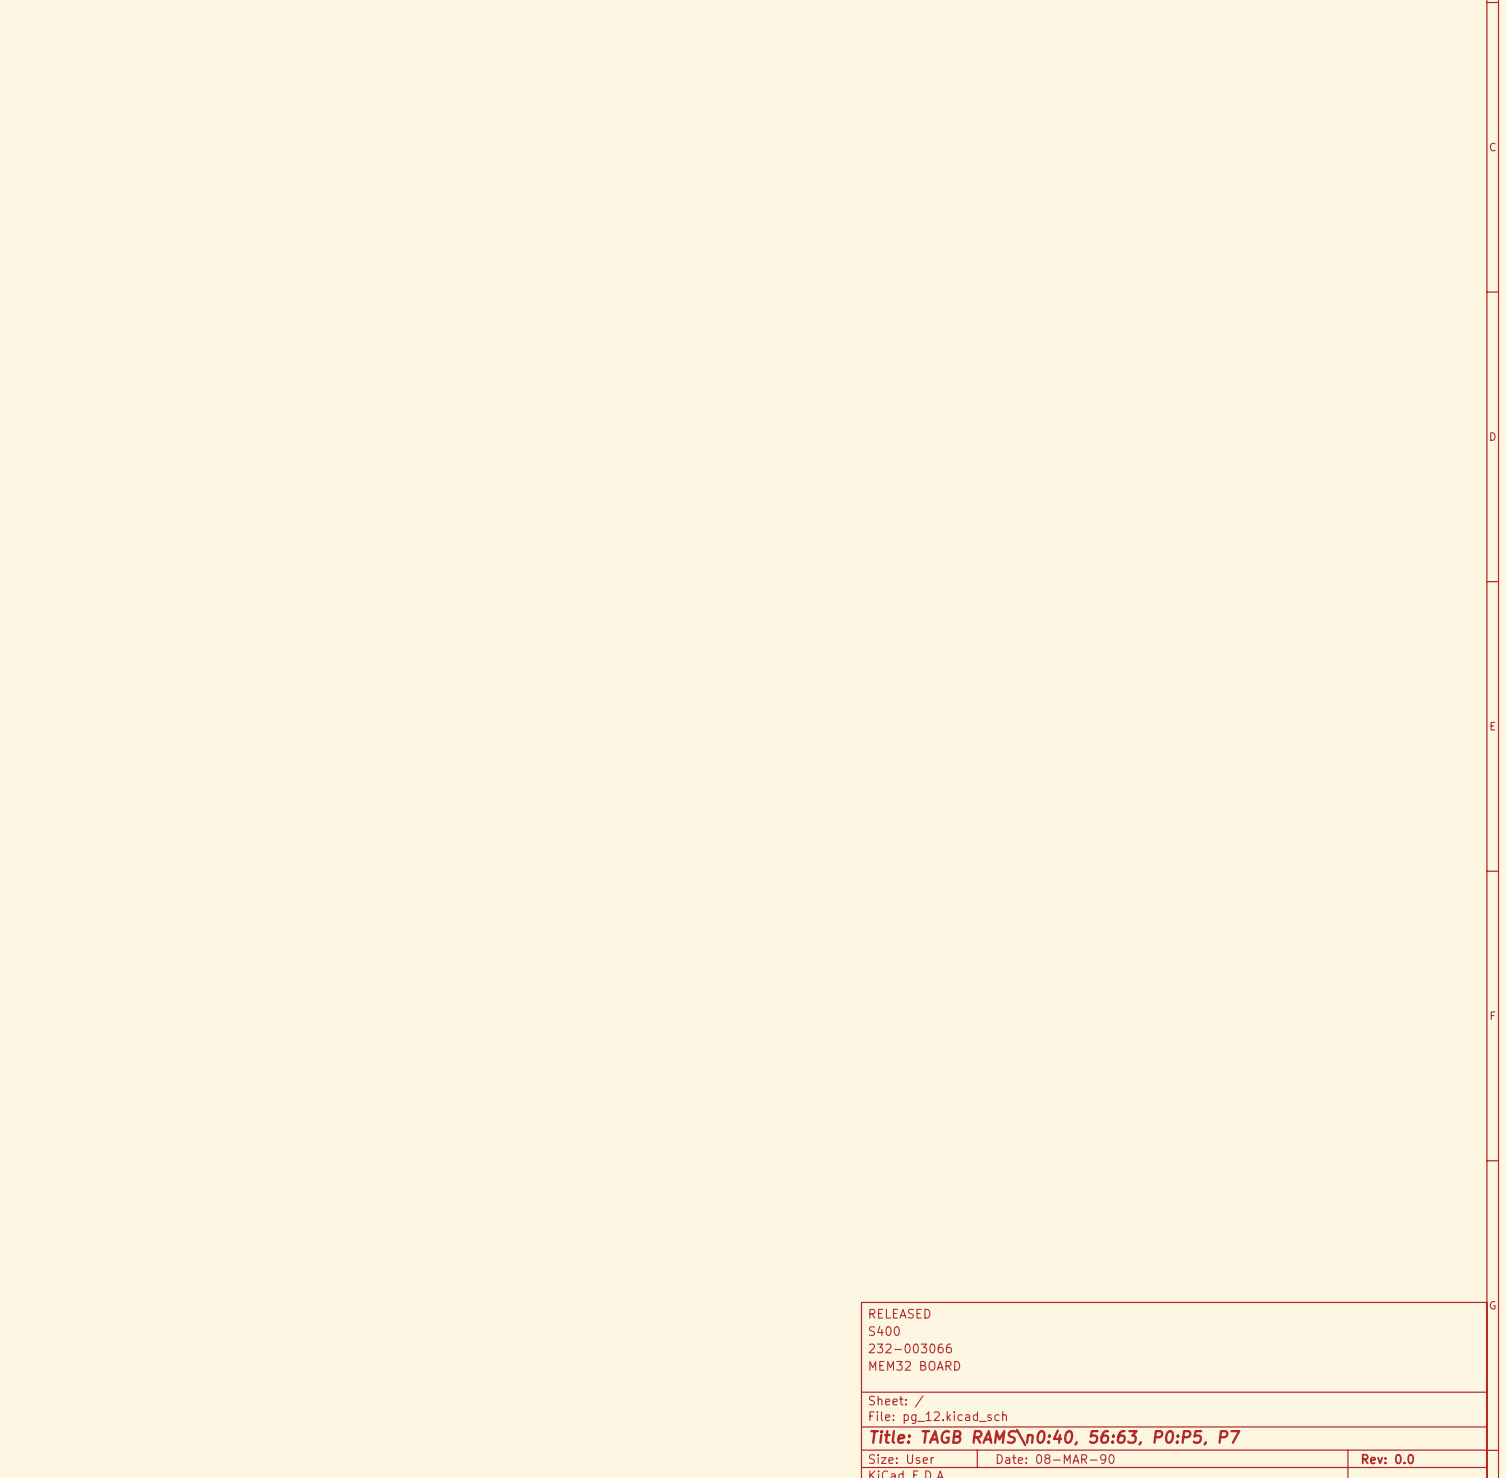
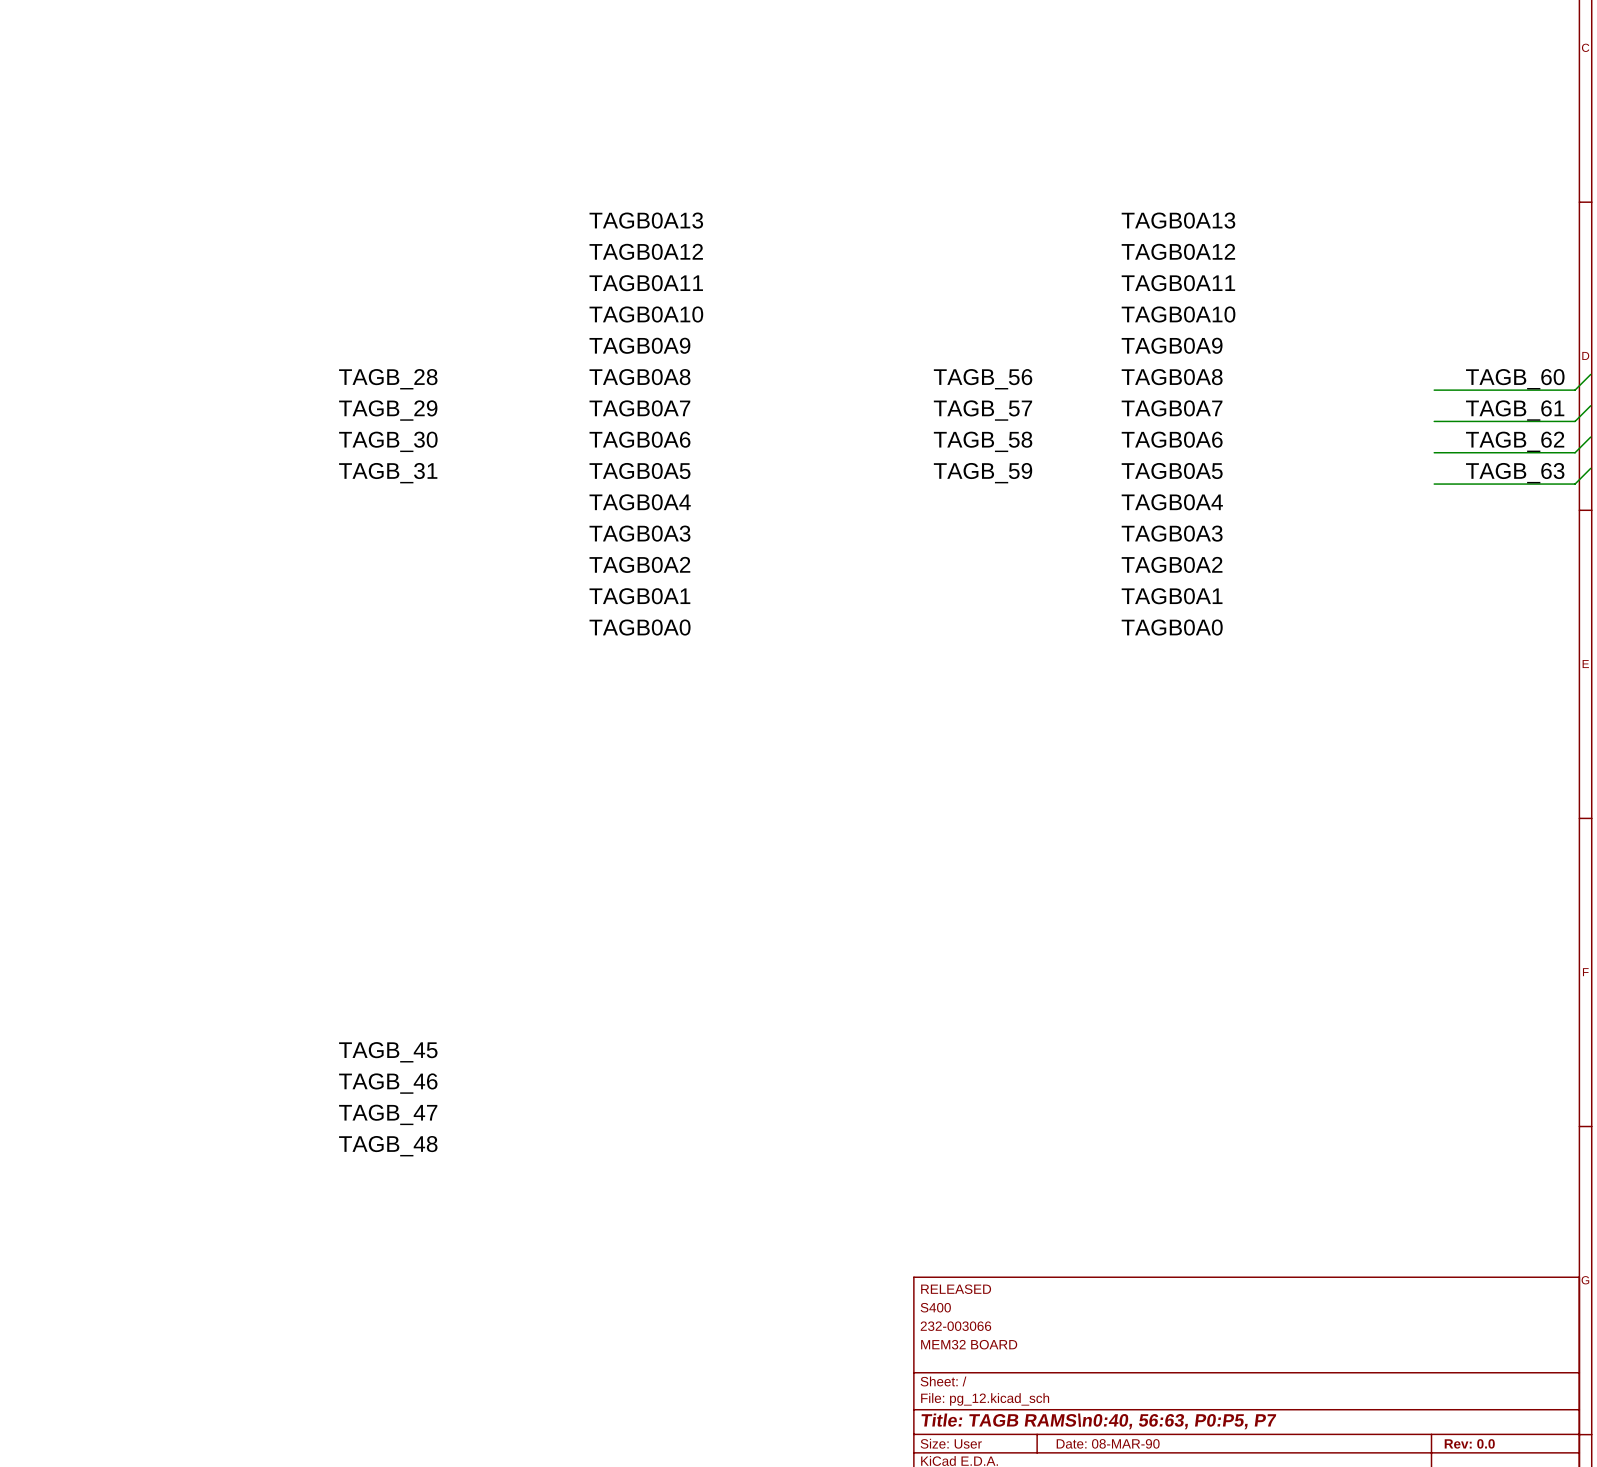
label: none -> TAGB0A13 (646, 220)
label: none -> TAGB0A13 (1178, 220)
label: none -> TAGB0A12 (646, 251)
label: none -> TAGB0A12 (1178, 251)
label: none -> TAGB0A11 (646, 283)
label: none -> TAGB0A11 (1178, 283)
label: none -> TAGB0A10 (646, 314)
label: none -> TAGB0A10 (1178, 314)
label: none -> TAGB0A9 (639, 345)
label: none -> TAGB0A9 (1172, 345)
wire: none -> (1590, 374) (1575, 390) (1434, 390)
label: none -> TAGB0A8 (639, 377)
label: none -> TAGB0A8 (1172, 377)
label: none -> TAGB_28 (388, 379)
label: none -> TAGB_56 (983, 379)
label: none -> TAGB_60 (1515, 379)
wire: none -> (1590, 405) (1575, 421) (1434, 421)
label: none -> TAGB0A7 (639, 408)
label: none -> TAGB0A7 (1172, 408)
label: none -> TAGB_29 (388, 410)
label: none -> TAGB_57 (982, 410)
label: none -> TAGB_61 (1515, 410)
wire: none -> (1590, 437) (1575, 452) (1434, 452)
label: none -> TAGB0A6 (639, 439)
label: none -> TAGB0A6 (1172, 439)
label: none -> TAGB_30 (388, 441)
label: none -> TAGB_58 (983, 441)
label: none -> TAGB_62 (1515, 441)
wire: none -> (1590, 468) (1575, 484) (1434, 484)
label: none -> TAGB0A5 (639, 471)
label: none -> TAGB0A5 (1172, 471)
label: none -> TAGB_31 (388, 473)
label: none -> TAGB_59 (983, 473)
label: none -> TAGB_63 (1515, 473)
label: none -> TAGB0A4 (640, 502)
label: none -> TAGB0A4 (1172, 502)
label: none -> TAGB0A3 (639, 533)
label: none -> TAGB0A3 (1172, 533)
label: none -> TAGB0A2 (639, 564)
label: none -> TAGB0A2 (1172, 564)
label: none -> TAGB0A1 (639, 596)
label: none -> TAGB0A1 (1172, 596)
label: none -> TAGB0A0 (640, 627)
label: none -> TAGB0A0 (1172, 627)
label: none -> TAGB_45 (388, 1052)
label: none -> TAGB_46 (388, 1083)
label: none -> TAGB_47 (388, 1114)
label: none -> TAGB_48 (388, 1146)

